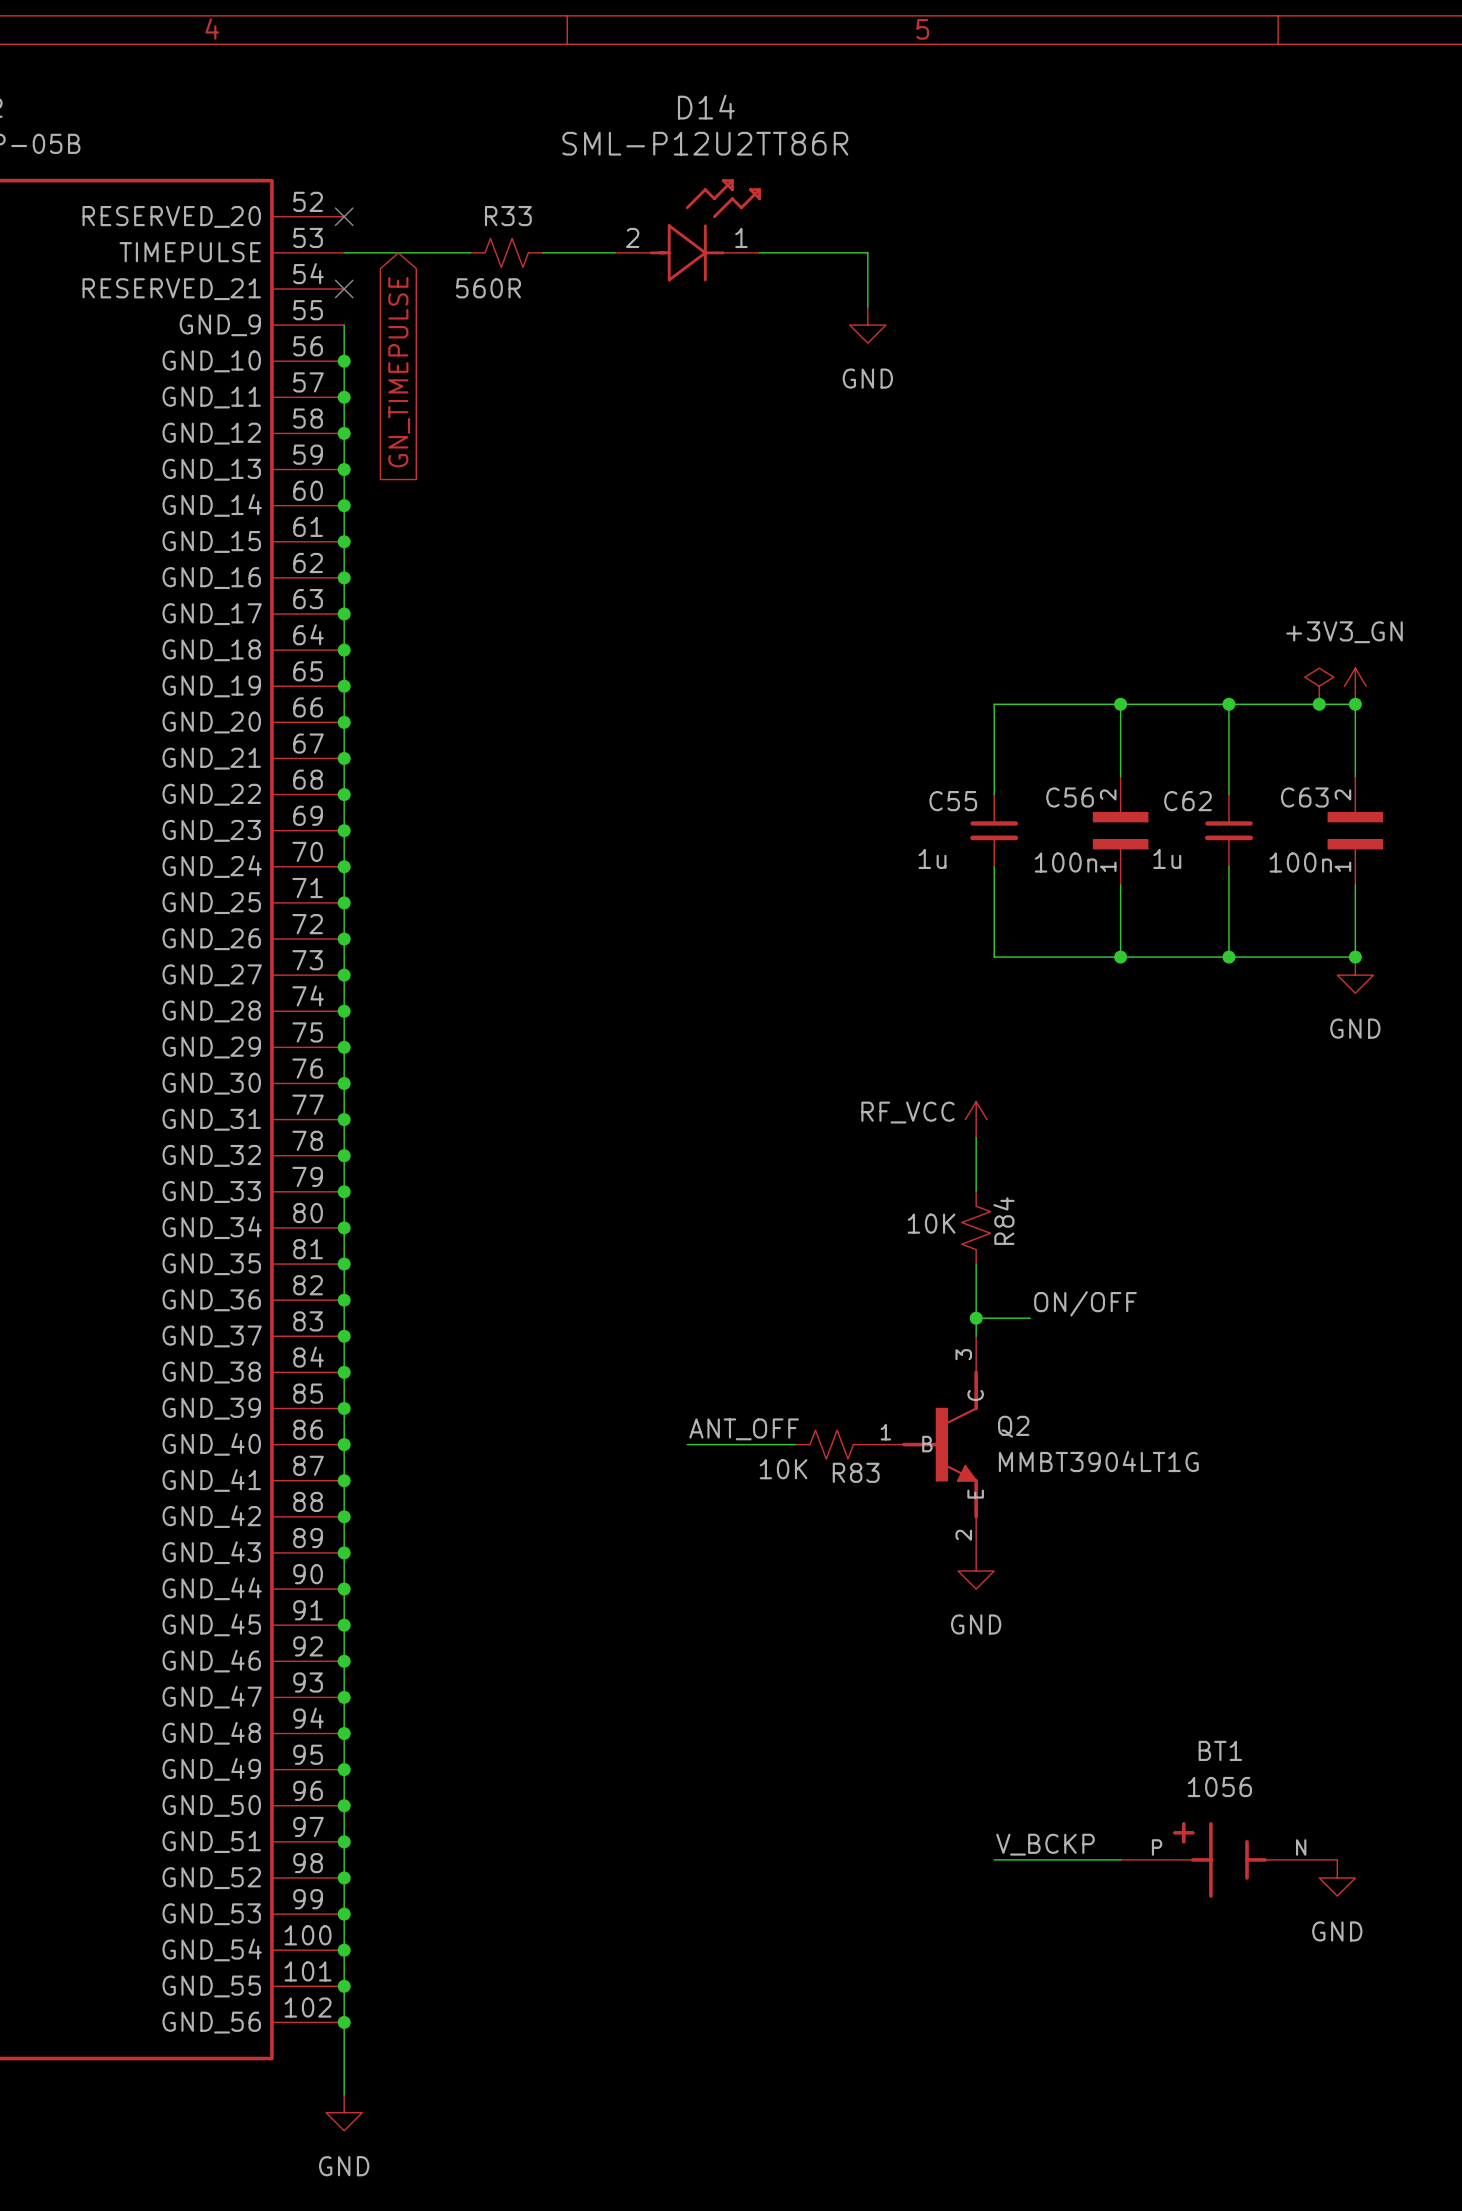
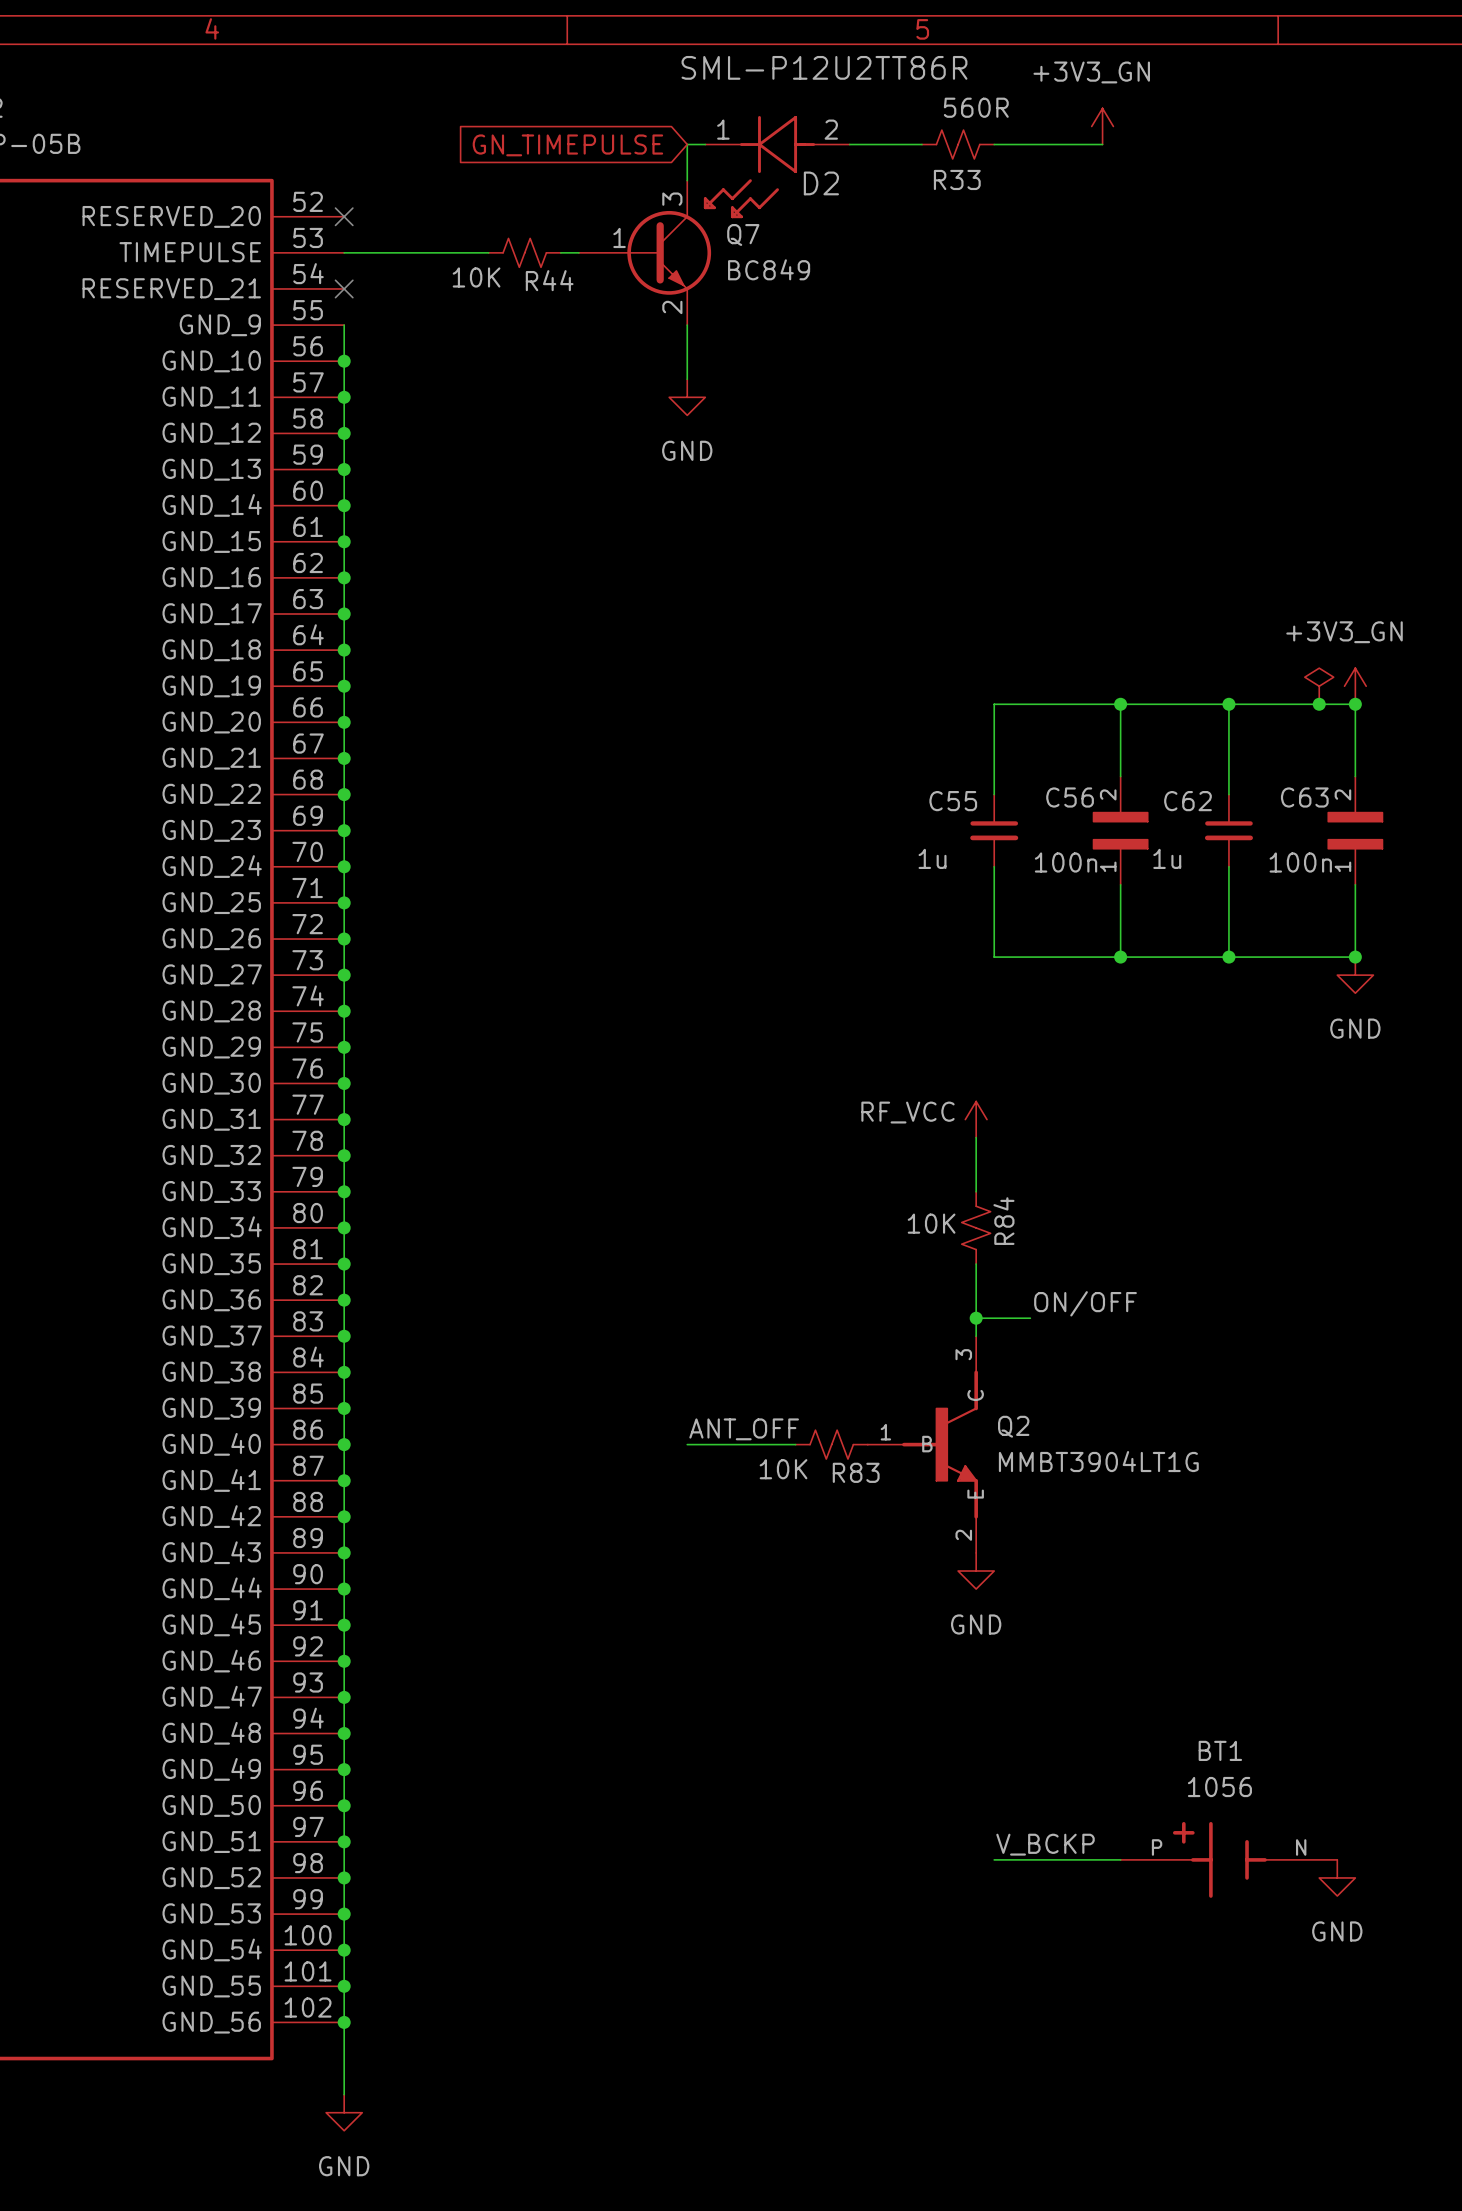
power symbol: none -> +3V3_GN (1102, 126)
wire: none -> (705, 144) (687, 144) (687, 180)
wire: none -> (849, 144) (921, 144)
wire: none -> (994, 144) (1102, 144)
D2: none -> SML-P12U2TT86R (776, 167)
R33 name position: R33 (508, 216) -> R33 (957, 179)
D14: SML-P12U2TT86R (687, 230) -> none
R33 position: (506, 252) -> (958, 144)
R44: none -> 10K (524, 252)
Q7: none -> BC849 (645, 252)
wire: (759, 252) (867, 252) (867, 307) -> none
R33 value position: 560R (488, 288) -> 560R (976, 107)
wire: none -> (687, 325) (687, 379)
power symbol position: GND (867, 325) -> GND (687, 397)
global label rotation: 0° (399, 372) -> 90° clockwise (567, 145)
global label position: GN_TIMEPULSE (399, 372) -> GN_TIMEPULSE (567, 145)

